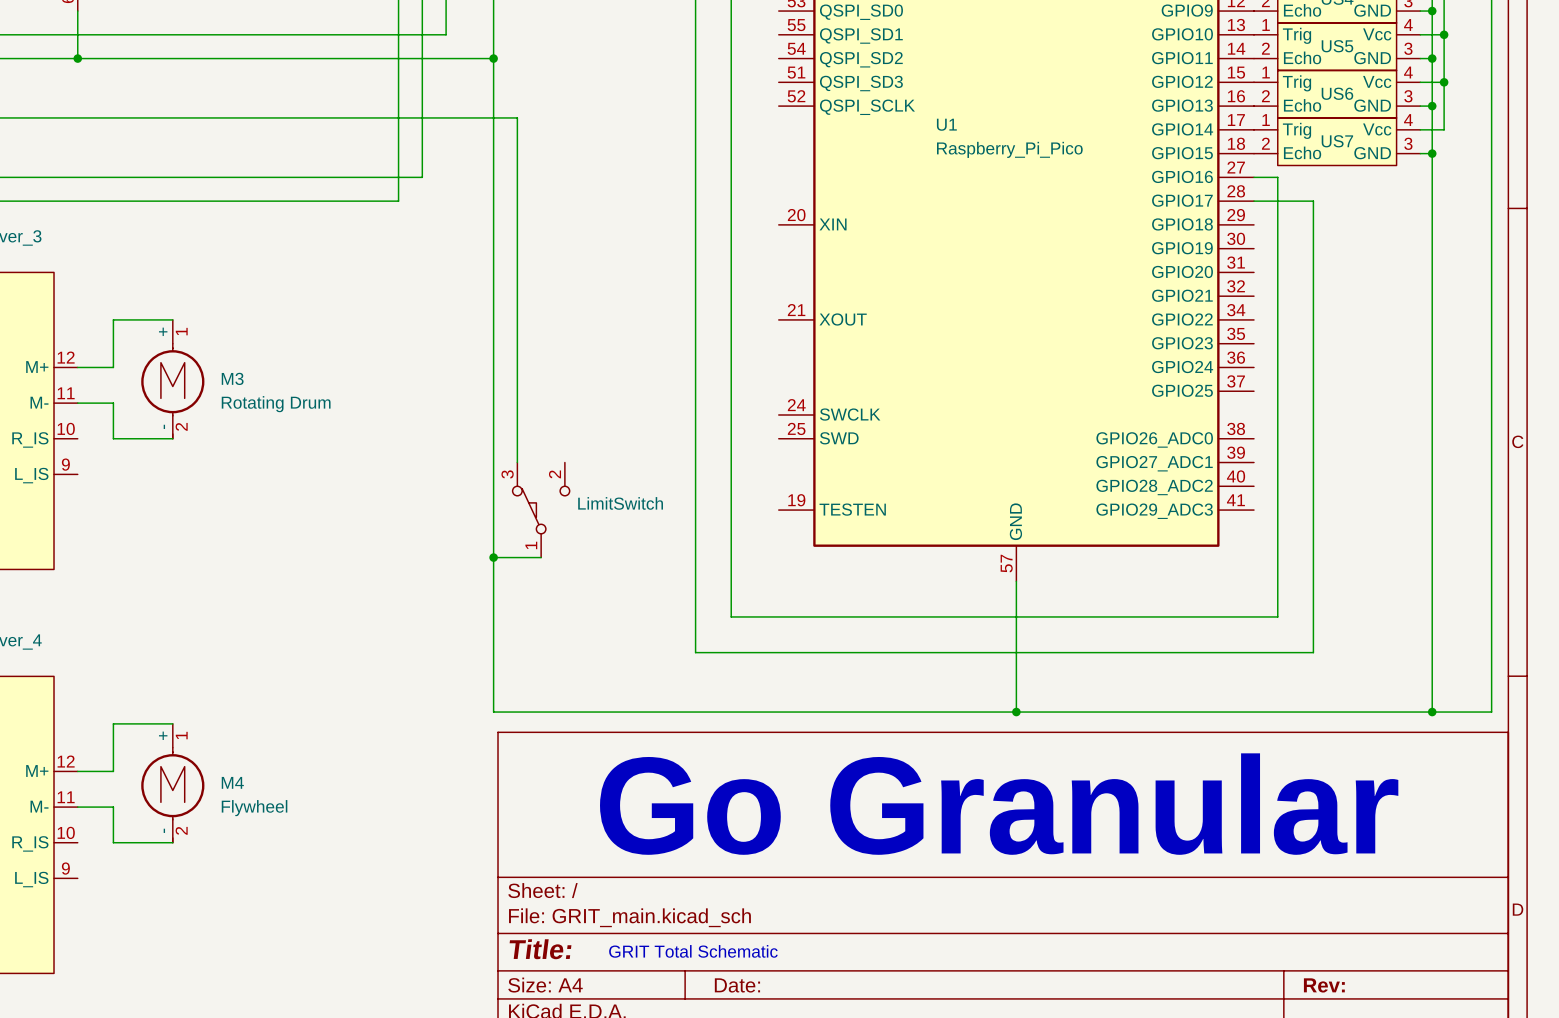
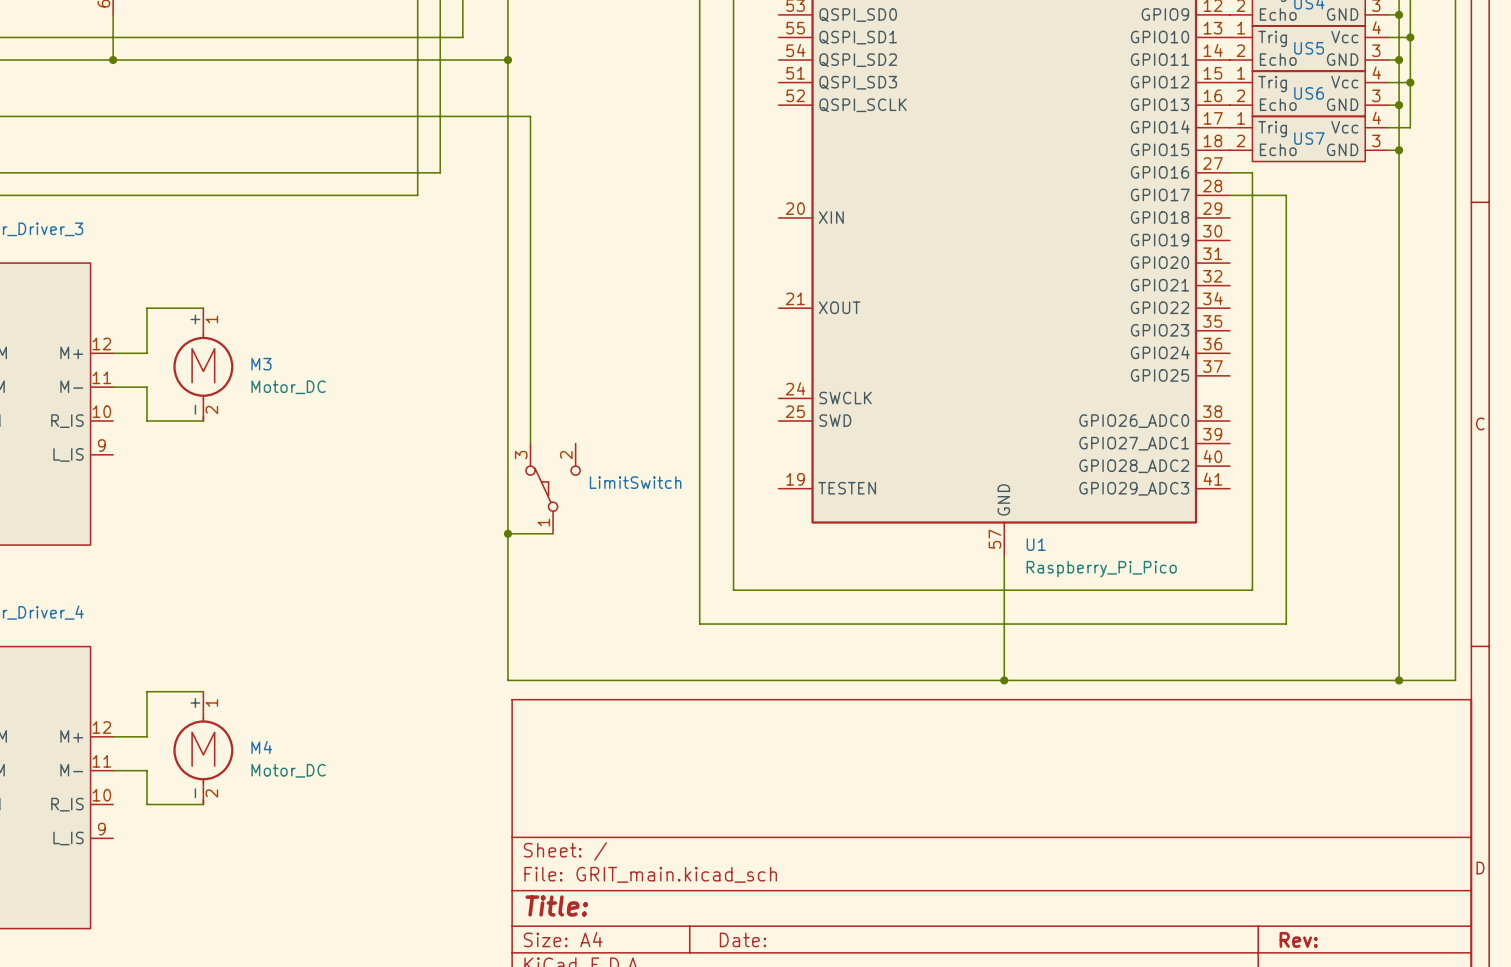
U1 name position: U1 (946, 124) -> U1 (1036, 544)
U1 value position: Raspberry_Pi_Pico (1009, 149) -> Raspberry_Pi_Pico (1101, 569)
M3 value: Rotating Drum (276, 404) -> Motor_DC (288, 387)
text: Go Granular (999, 804) -> none
M4 value: Flywheel (254, 808) -> Motor_DC (288, 770)
text: GRIT Total Schematic (693, 951) -> none

